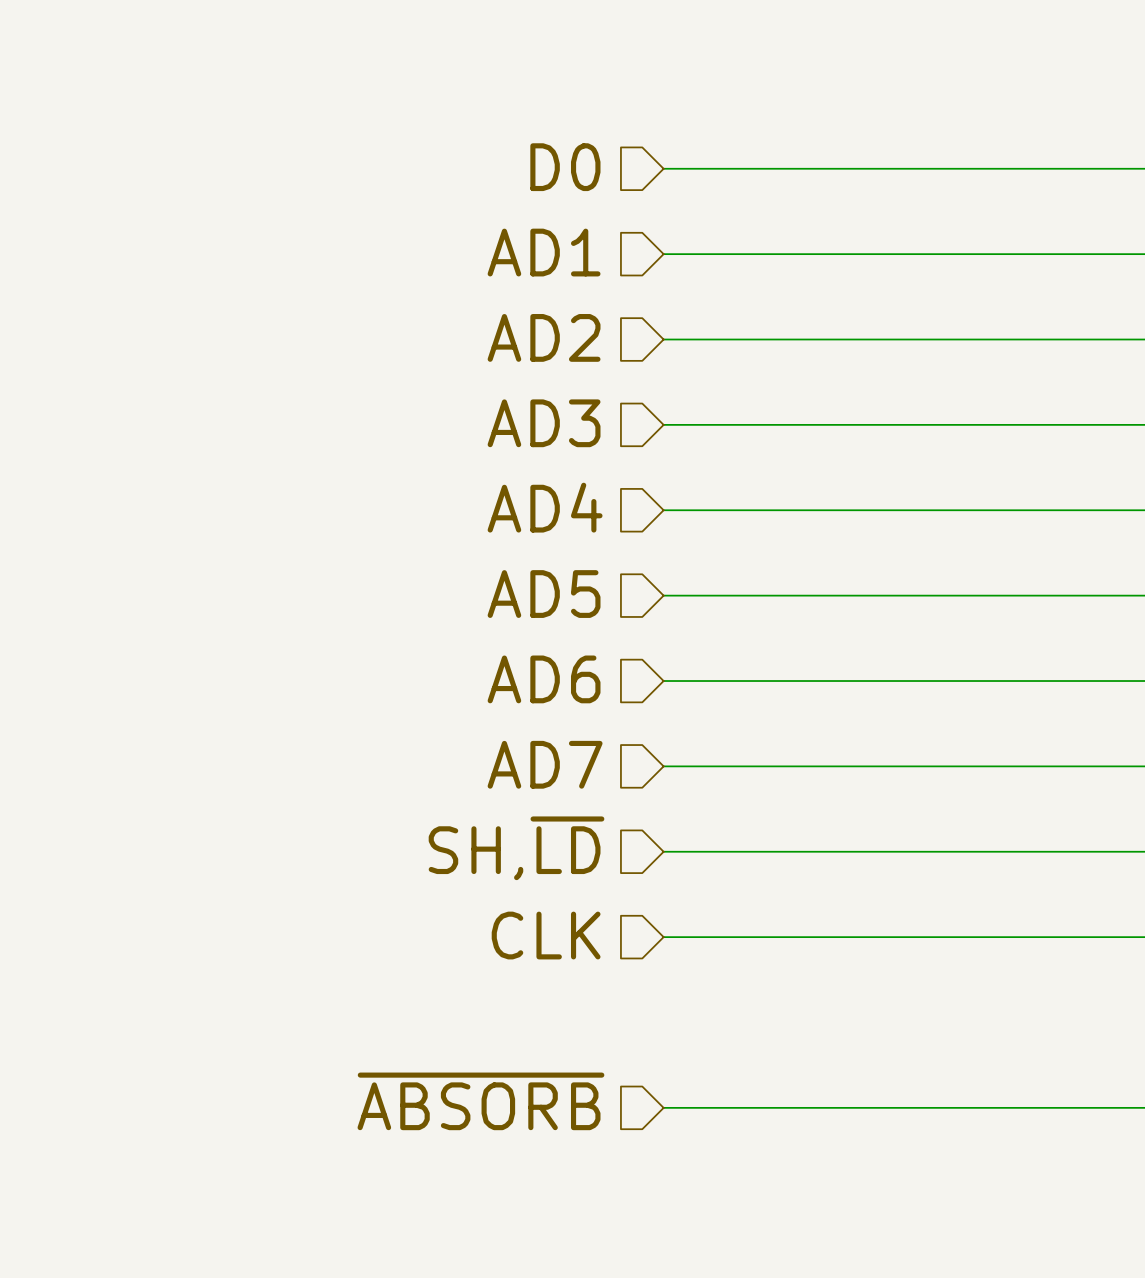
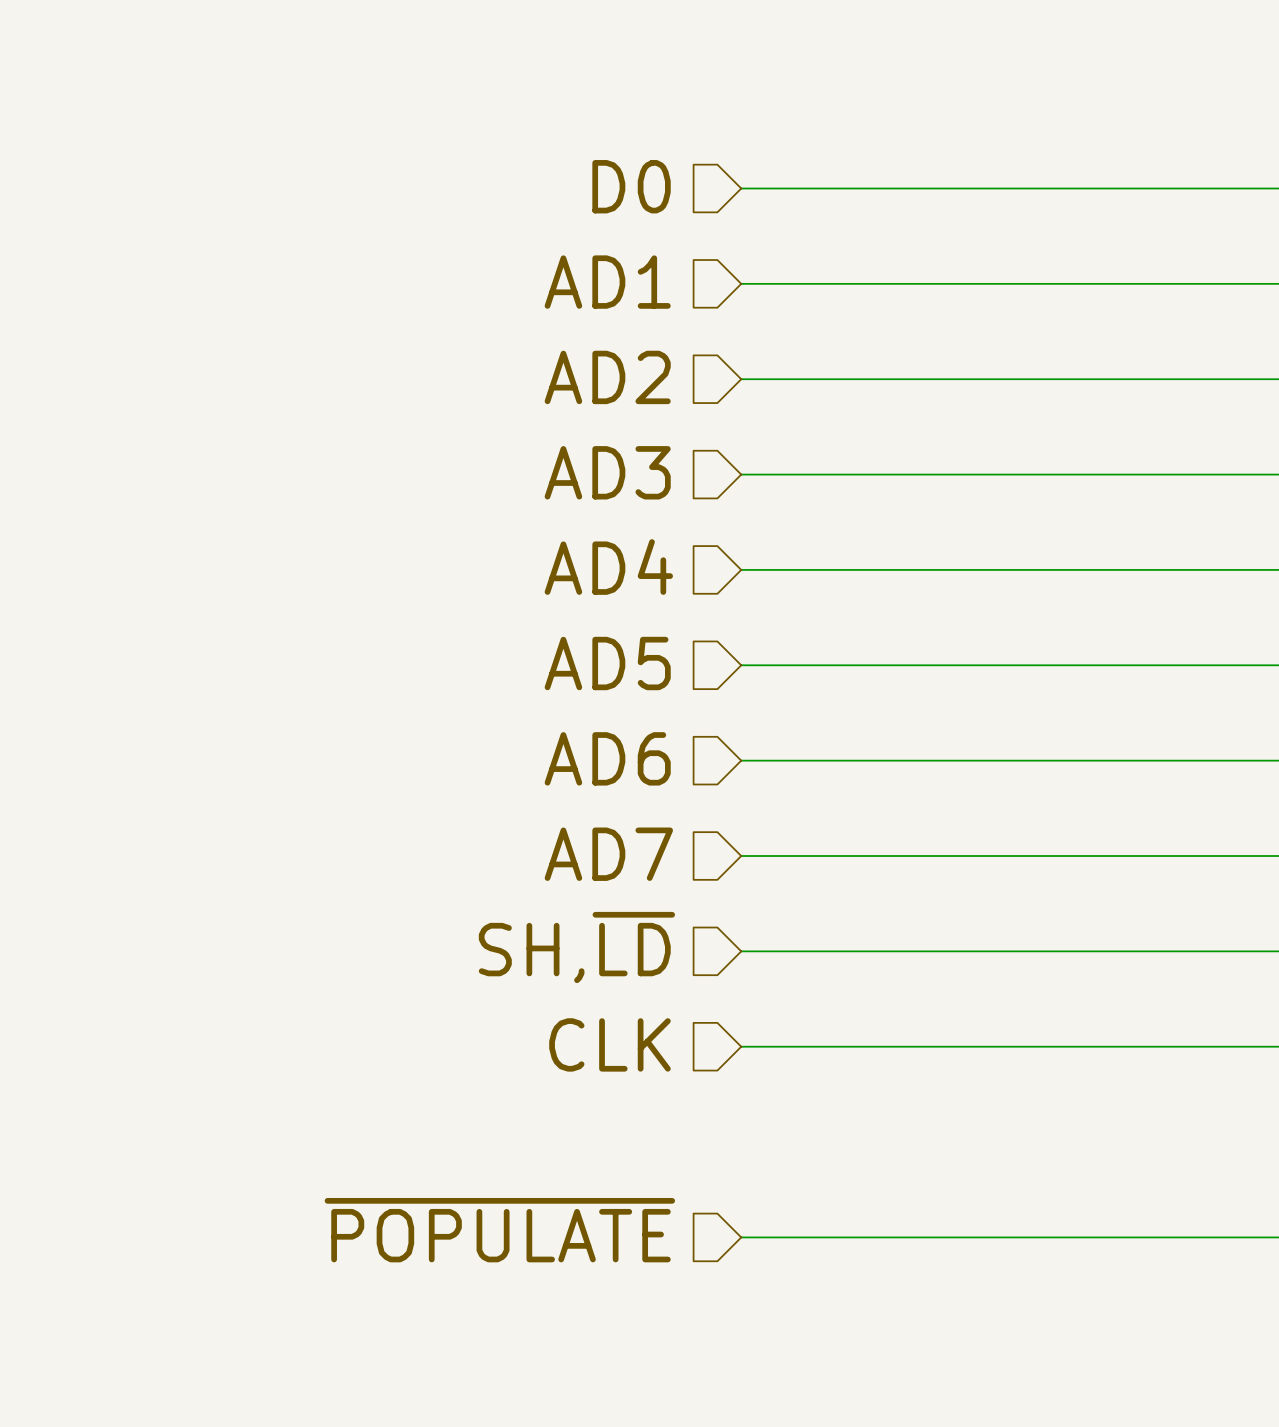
hierarchical label: ~{ABSORB} (480, 1101) -> ~{POPULATE} (499, 1230)

